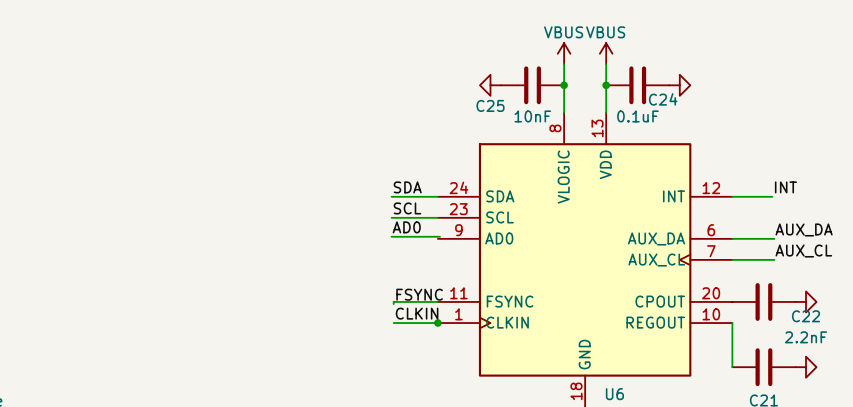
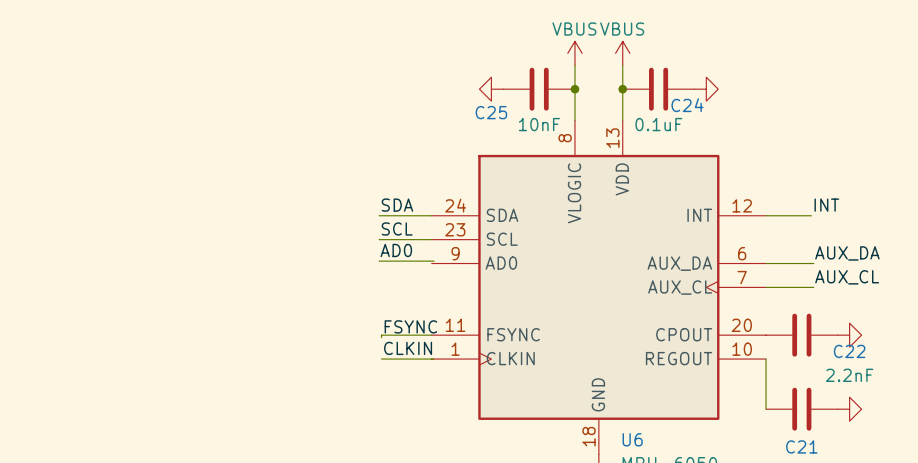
junction: (437, 323) -> none

